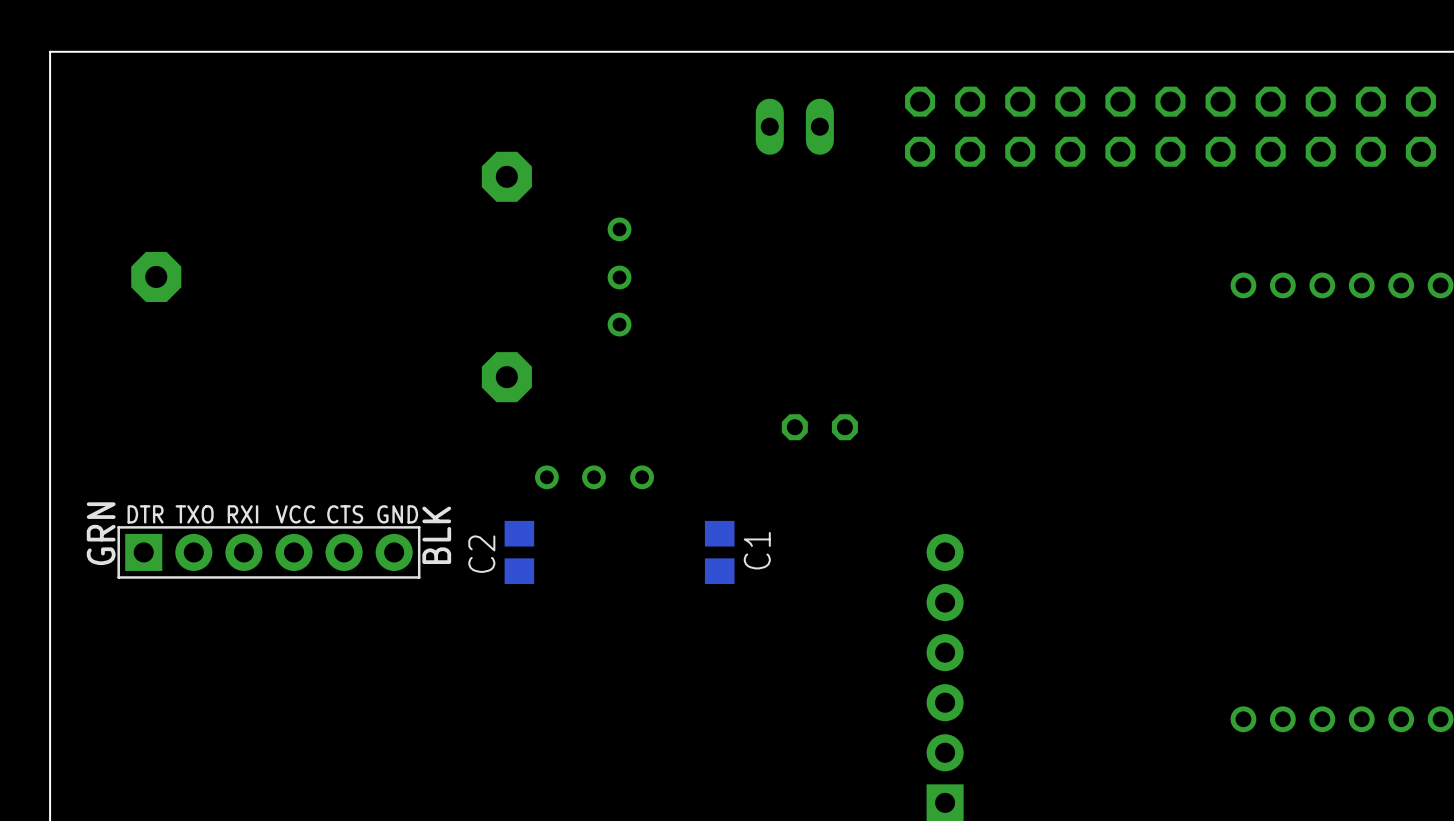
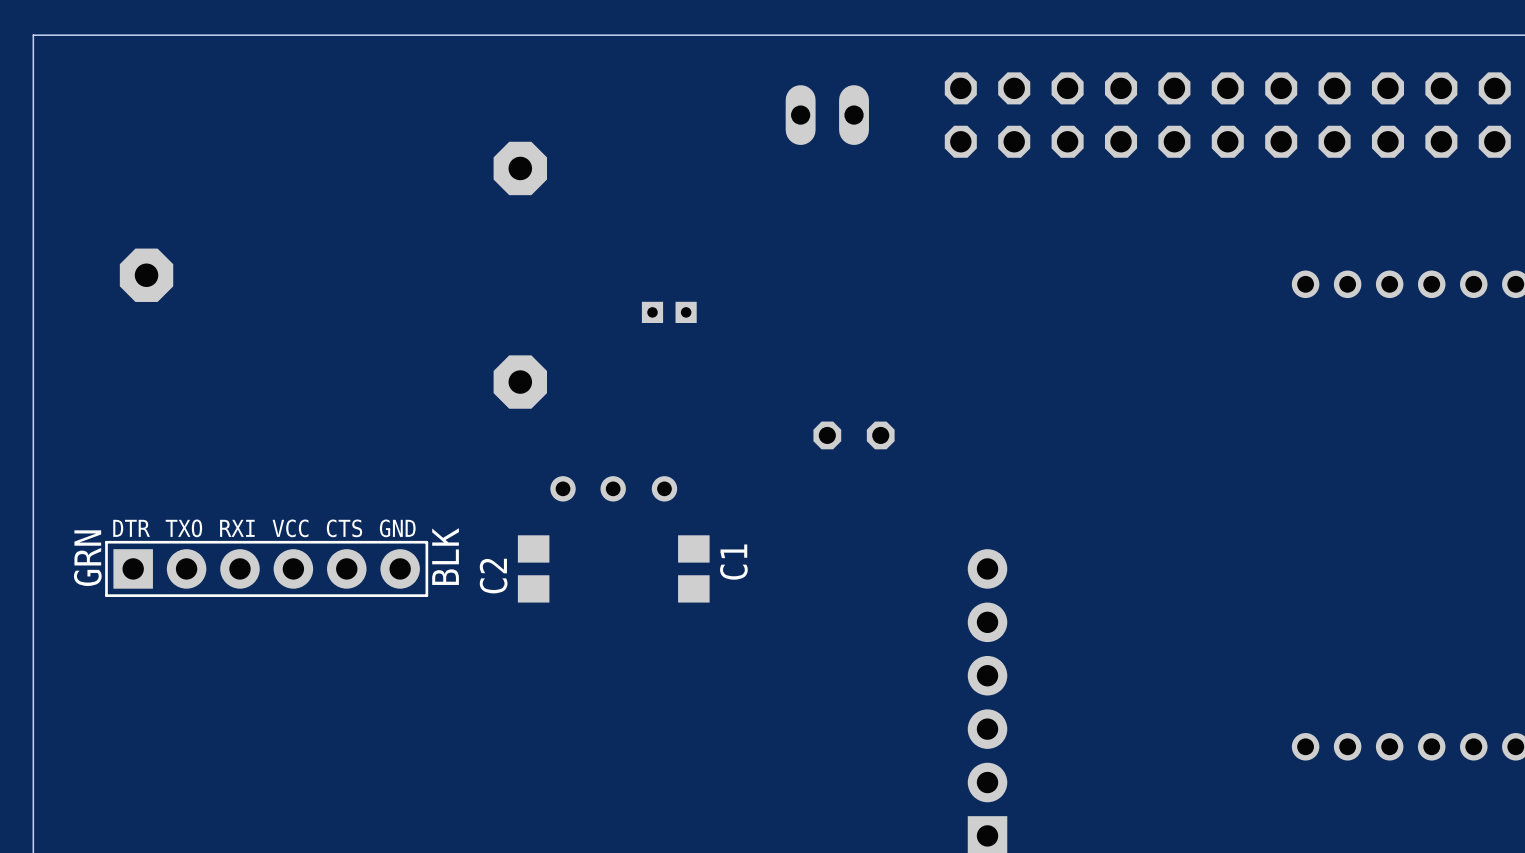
part: (619, 276) -> none
part: none -> (669, 312)
C1 position: (719, 552) -> (693, 568)

